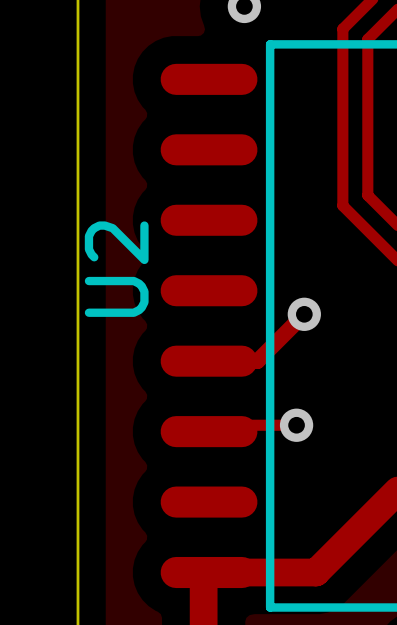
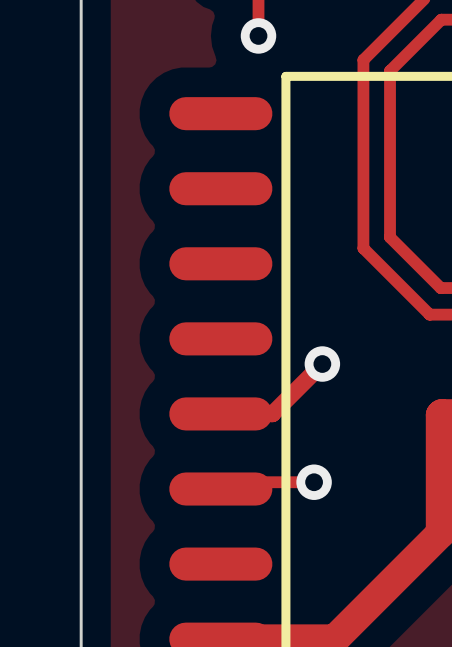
U2 name: U2 (116, 269) -> none

